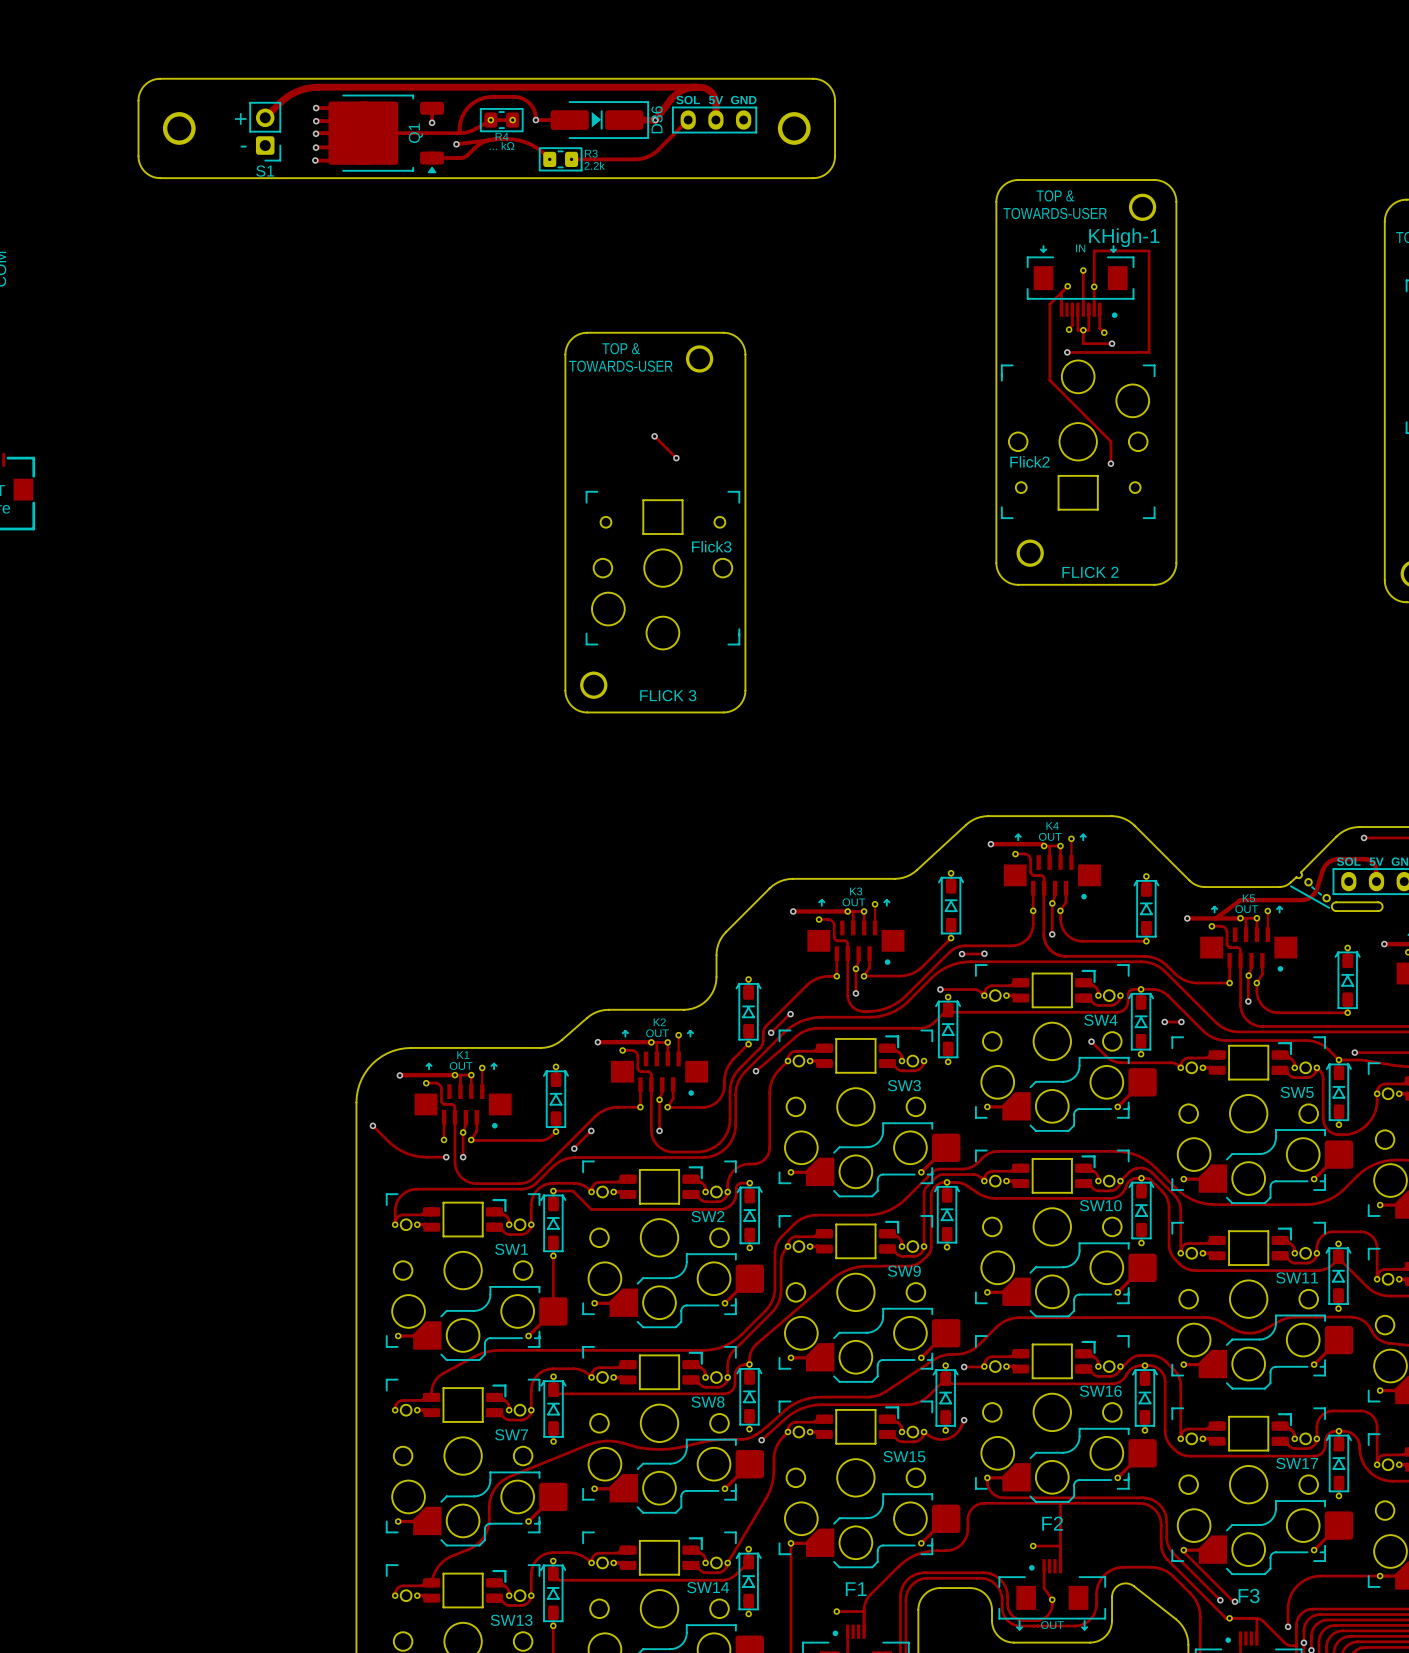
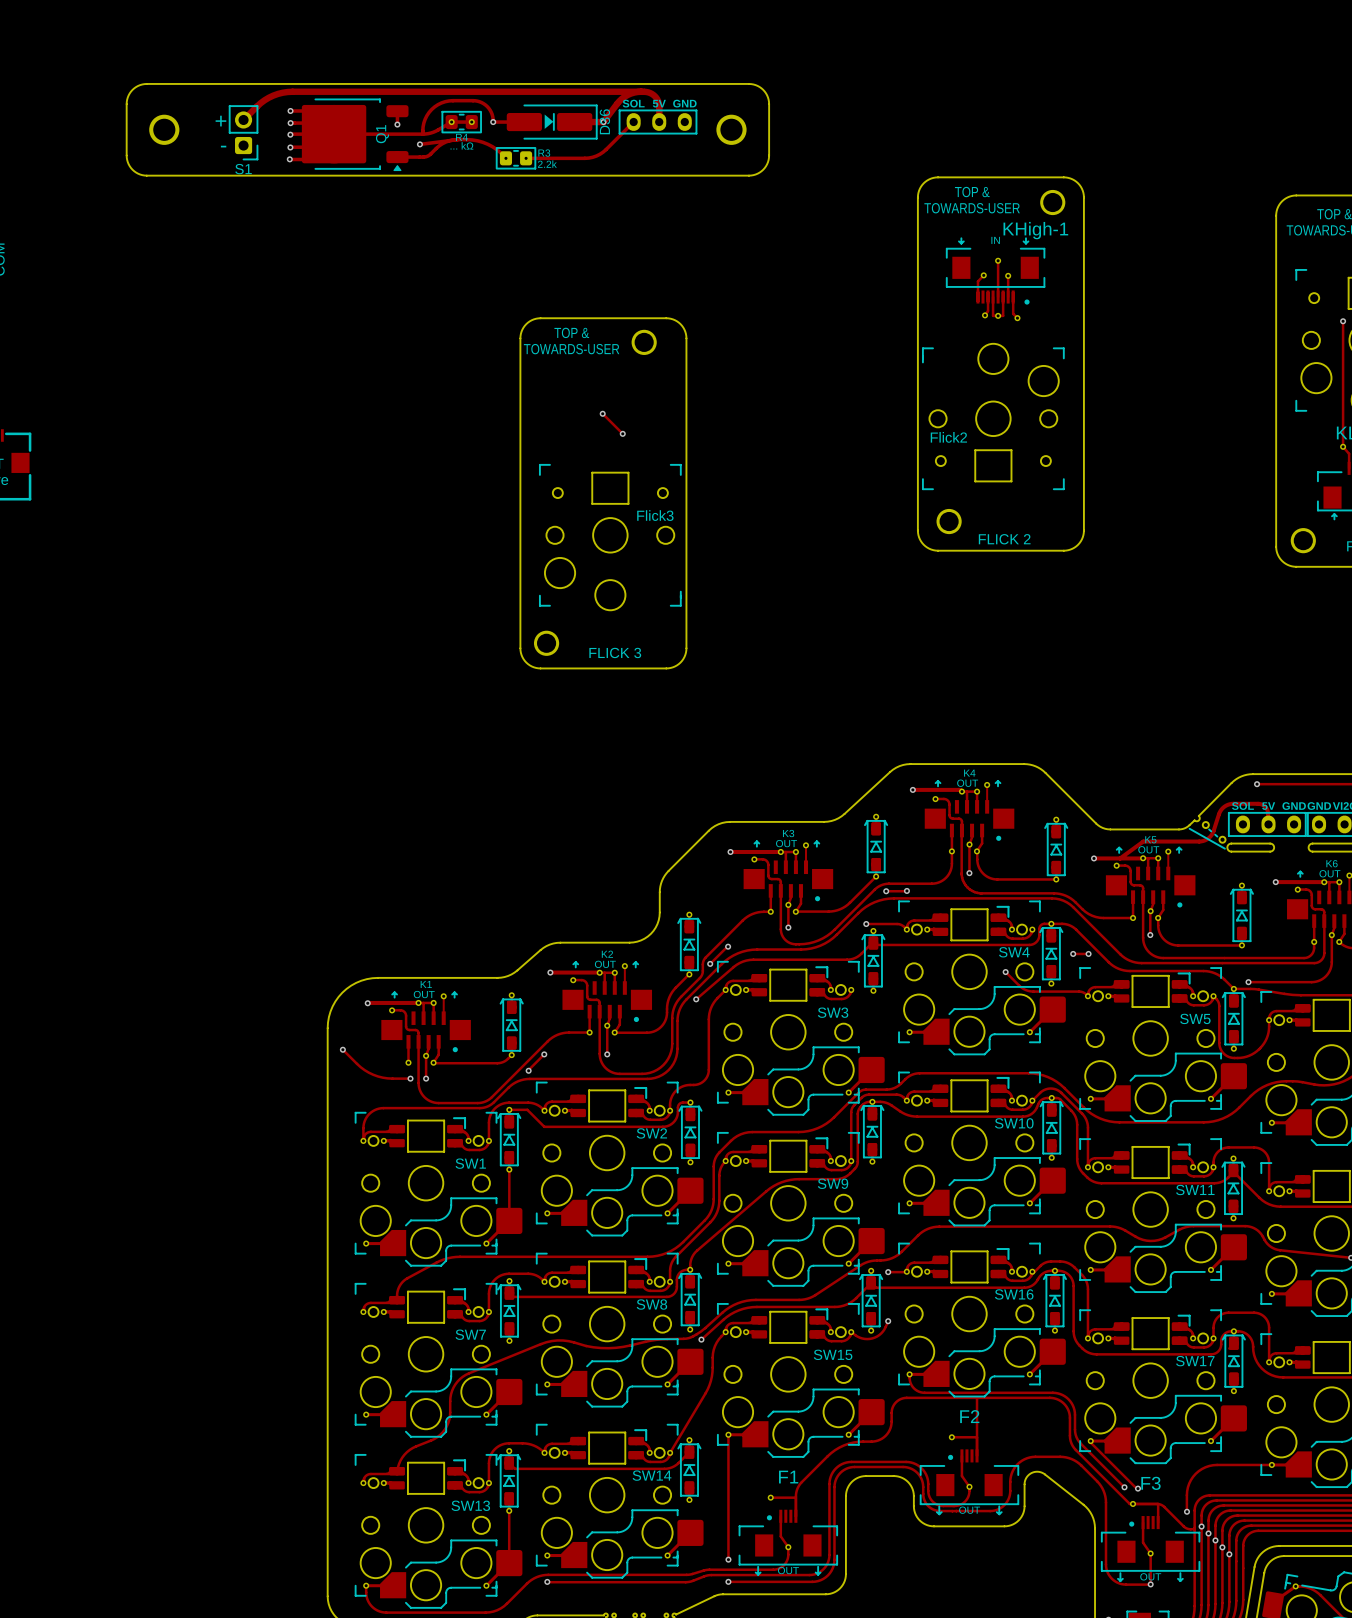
track: (1067, 286) (1049, 304) (1049, 380) (1110, 441) (1110, 463) -> none
track: (1094, 286) (1094, 250) (1149, 250) (1149, 352) (1067, 352) -> none
track: (1083, 330) (1083, 343) (1112, 343) -> none
via: (1112, 343) -> none
via: (1067, 352) -> none
via: (1110, 463) -> none

